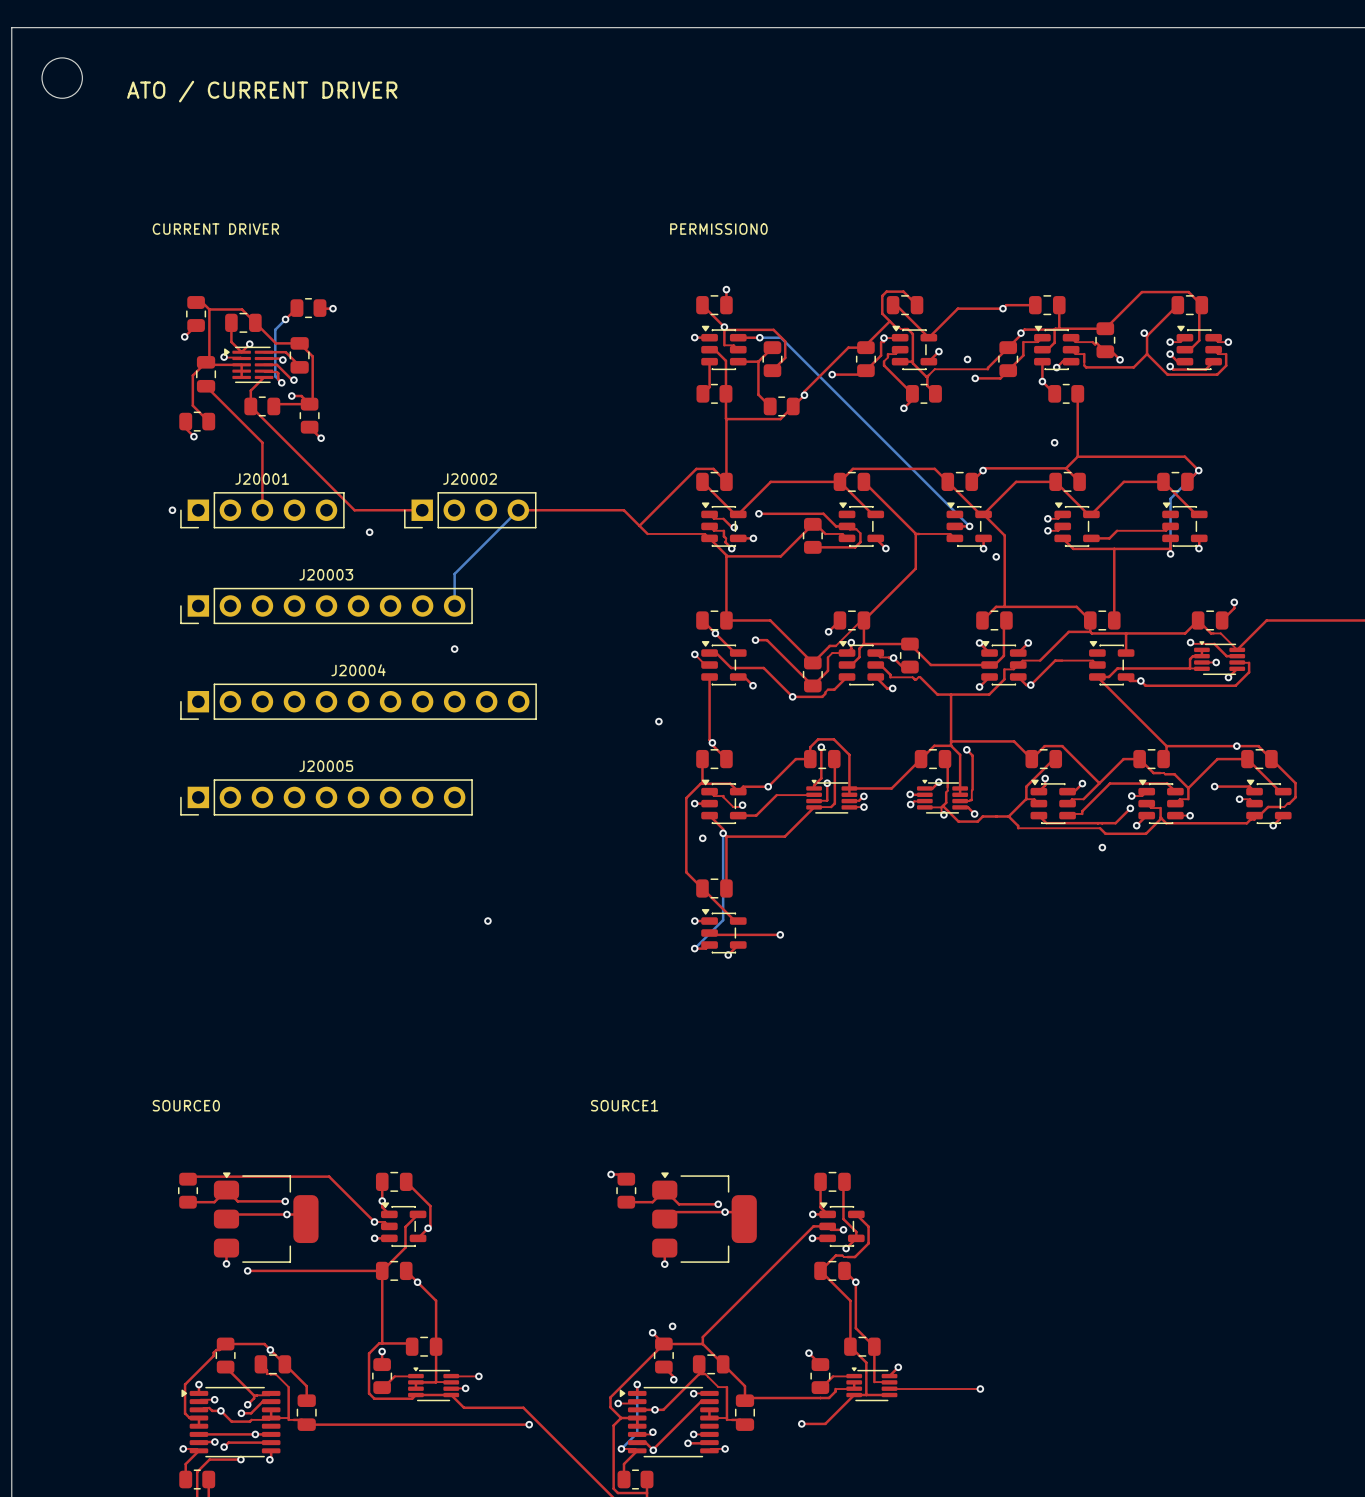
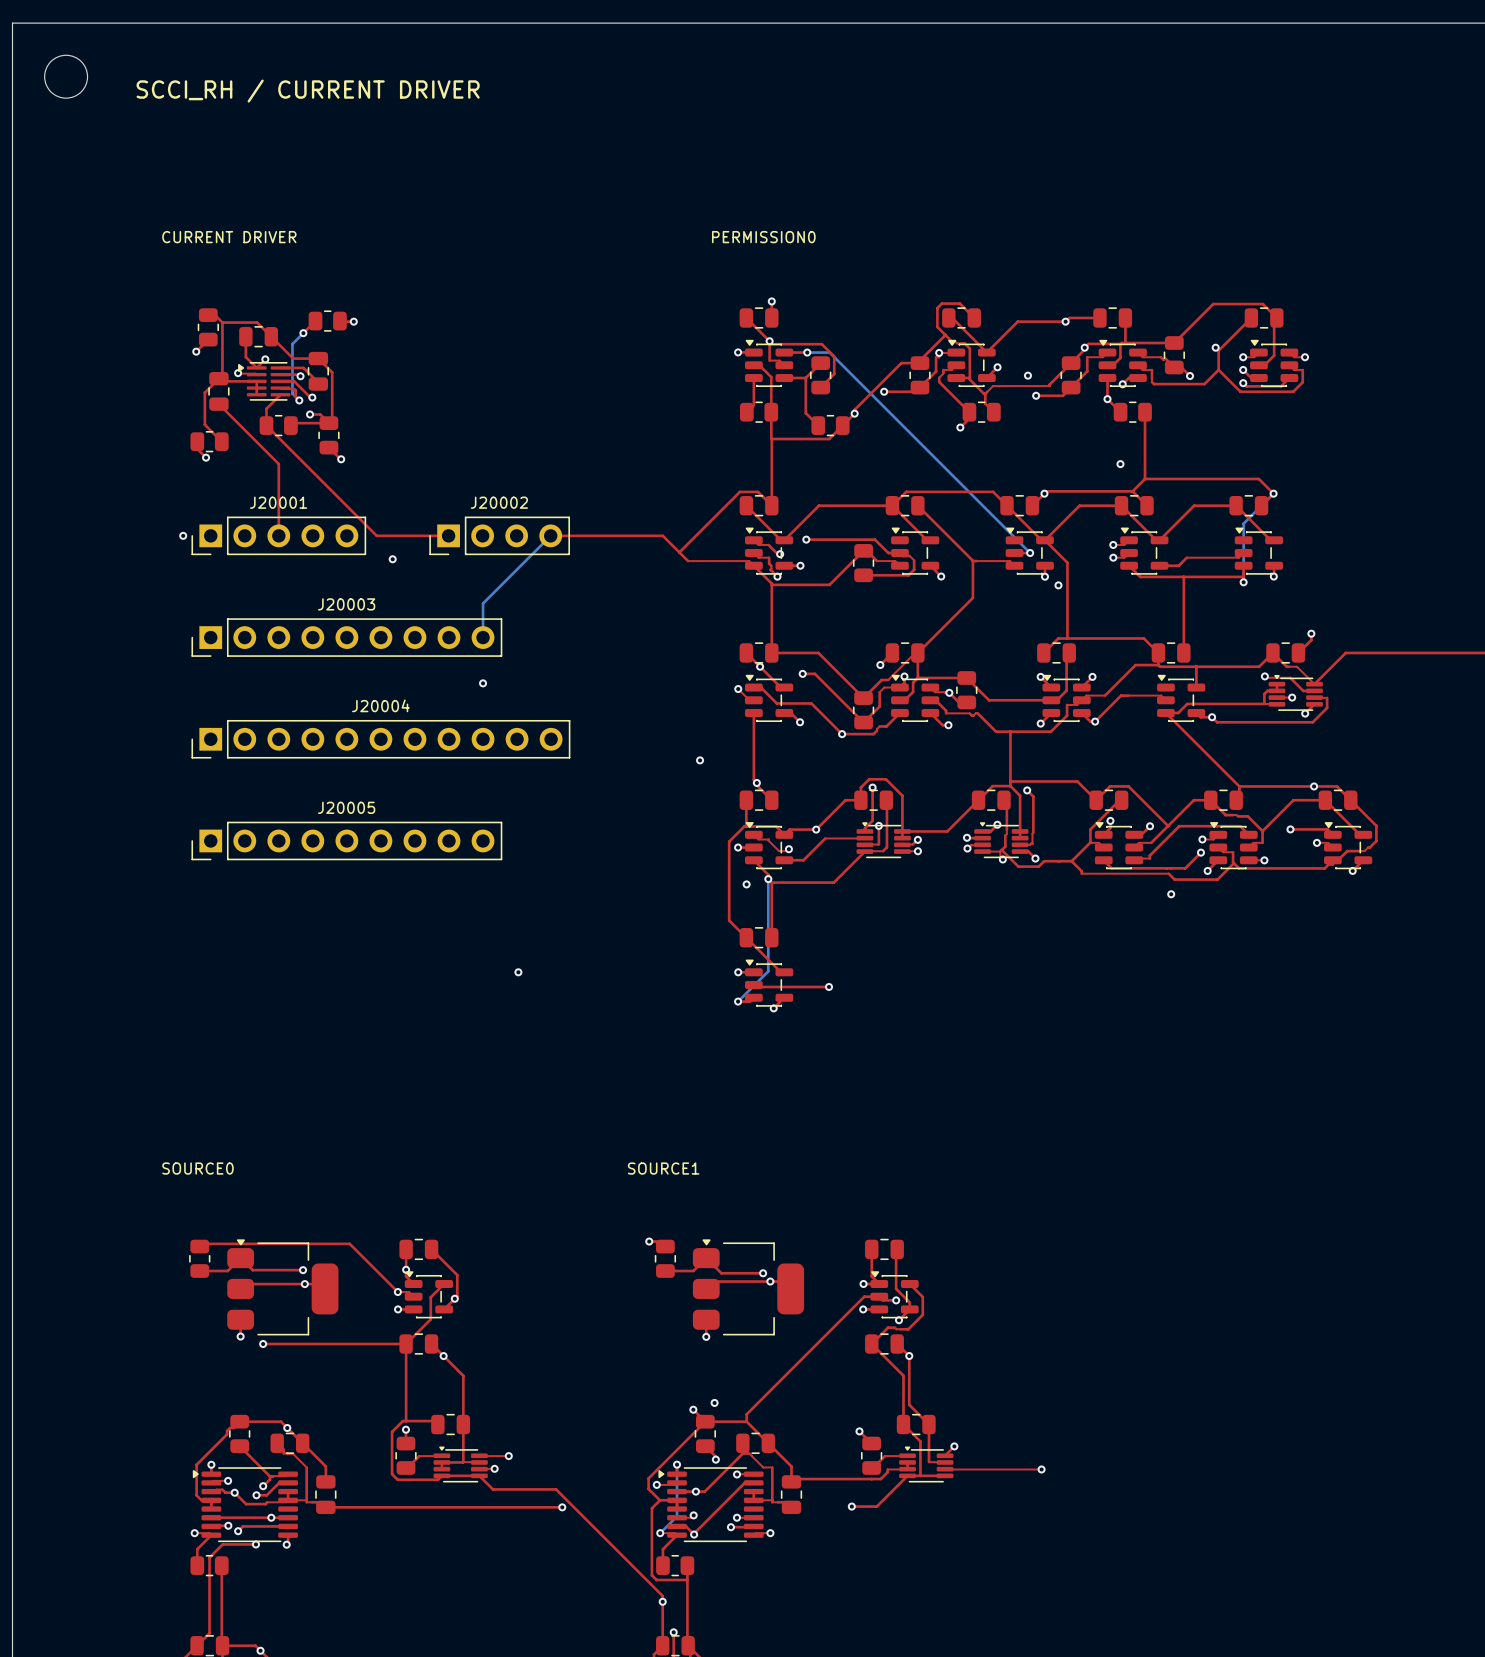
text: ATO / CURRENT DRIVER (262, 91) -> SCCI_RH / CURRENT DRIVER (308, 91)

